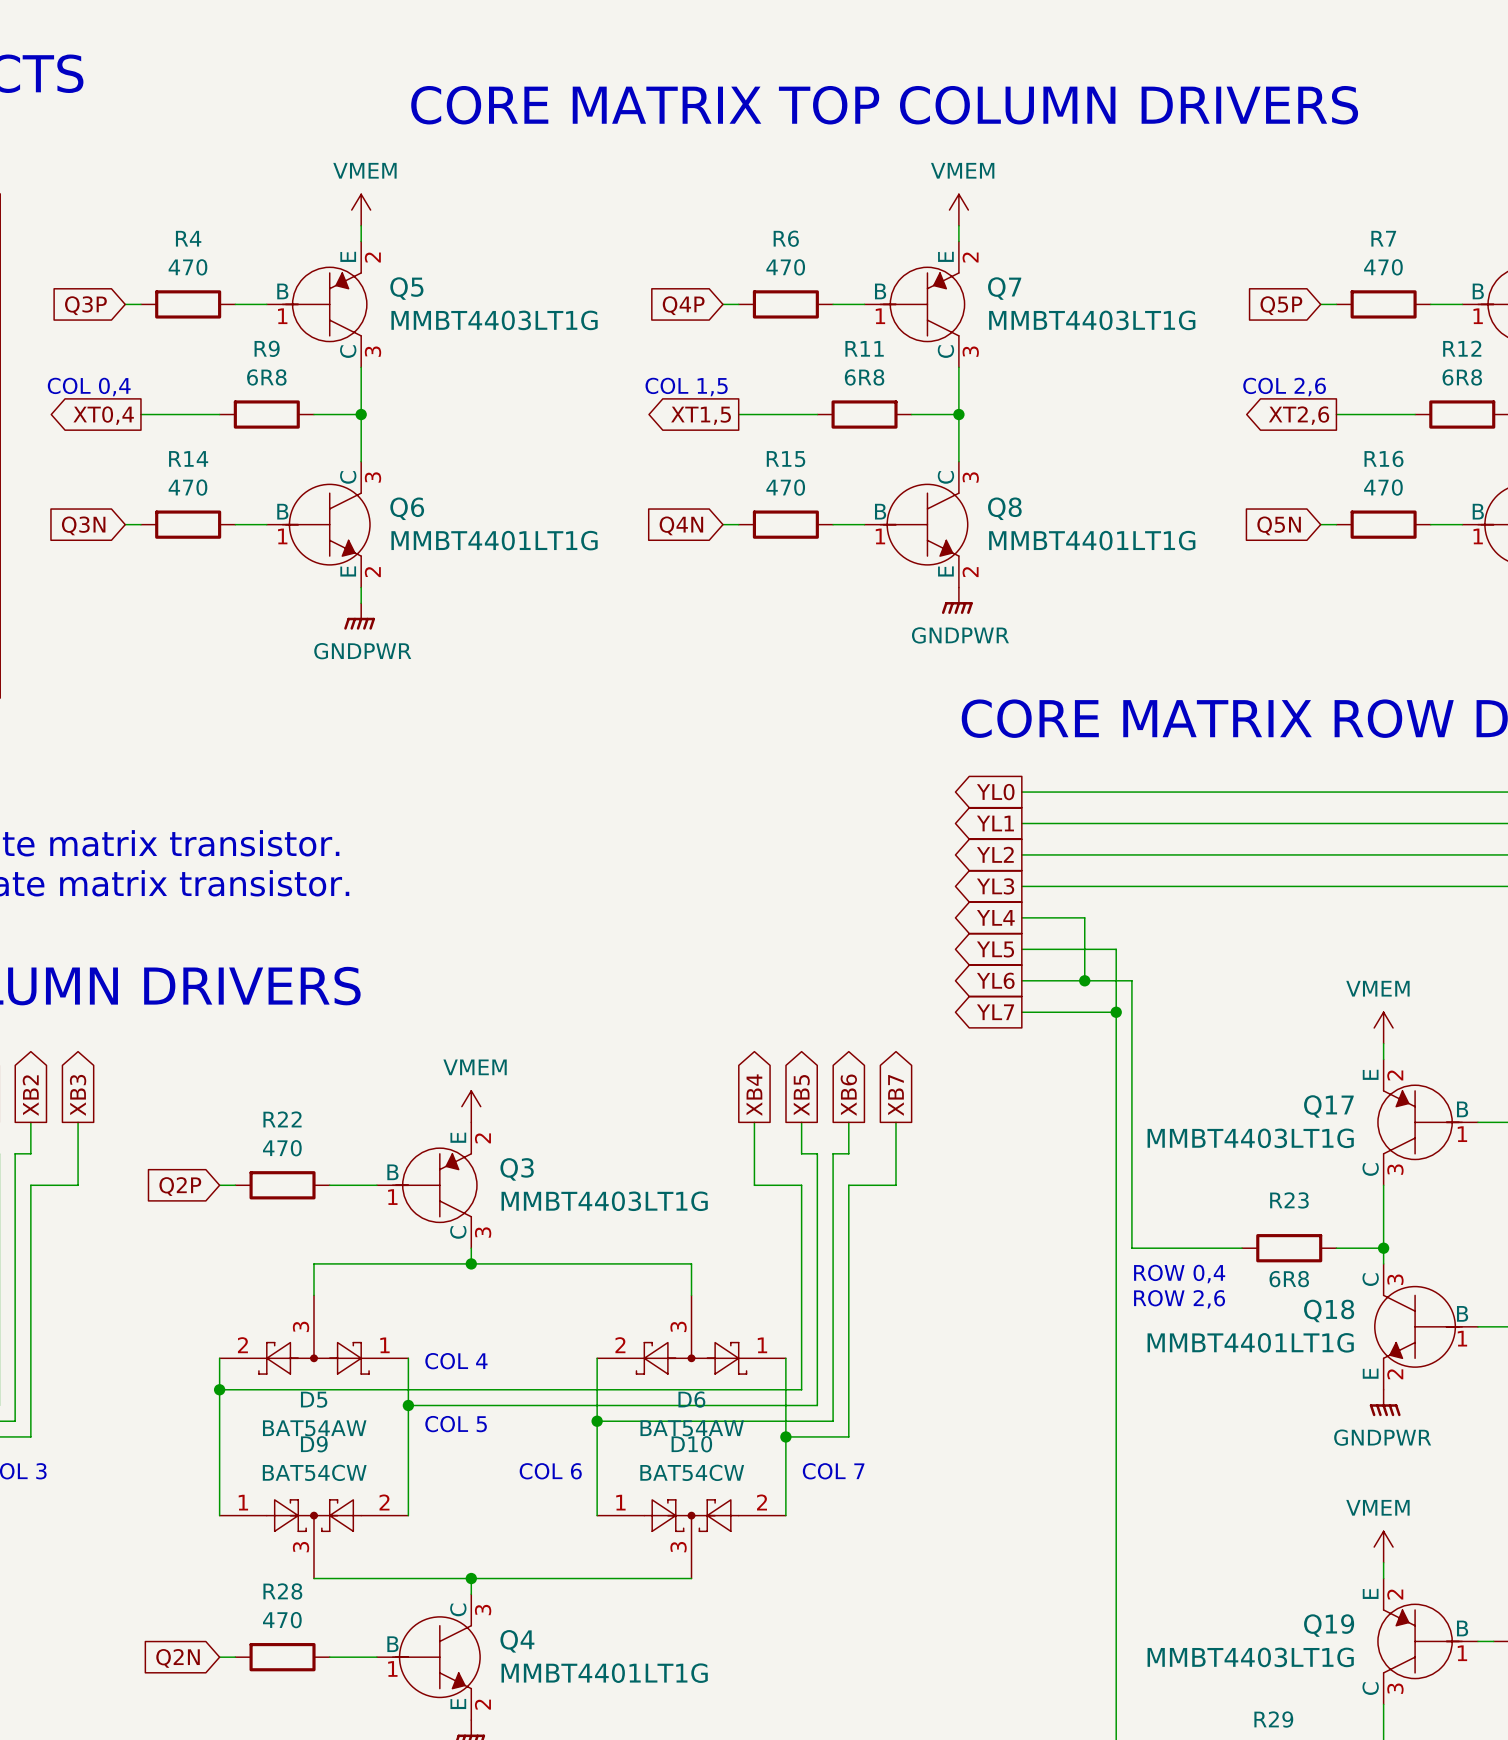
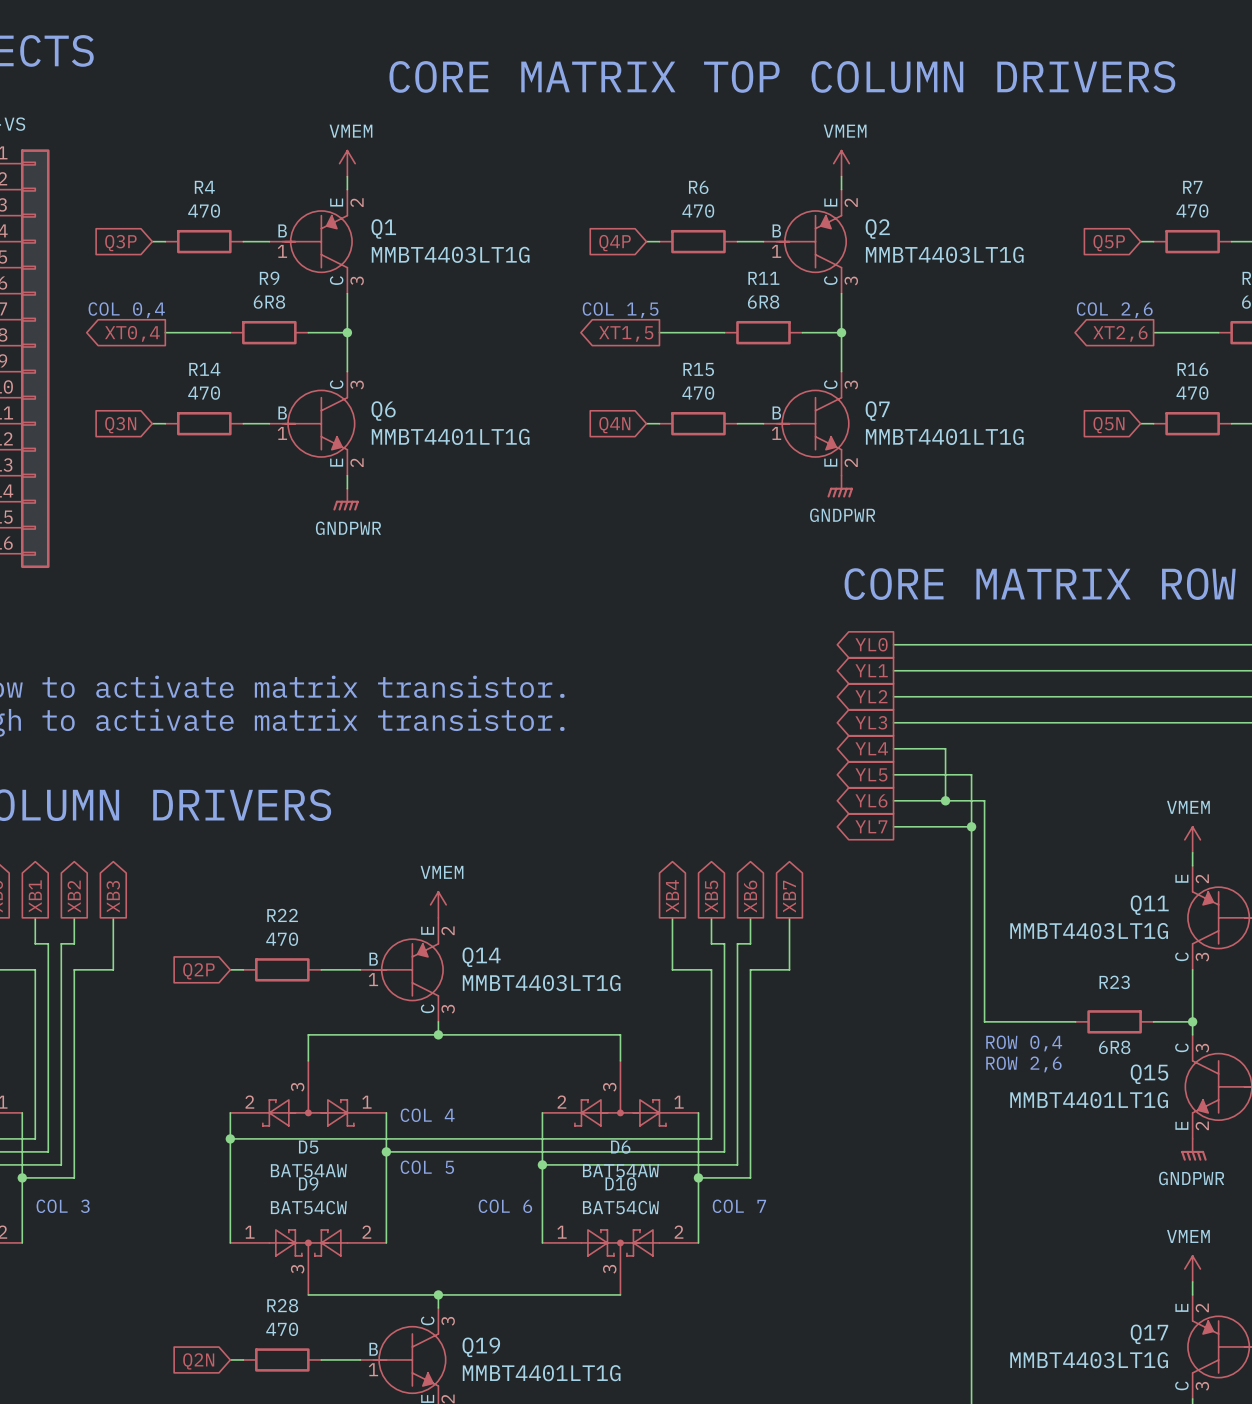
Q5 name: Q5 (406, 288) -> Q1 (383, 228)
Q7 name: Q7 (1004, 288) -> Q2 (877, 228)
Q8 name: Q8 (1004, 508) -> Q7 (877, 411)
Q17 name: Q17 (1328, 1106) -> Q11 (1149, 905)
Q3 name: Q3 (517, 1169) -> Q14 (481, 957)
Q18 name: Q18 (1329, 1310) -> Q15 (1149, 1074)
Q19 name: Q19 (1329, 1625) -> Q17 (1149, 1334)
Q4 name: Q4 (517, 1641) -> Q19 (481, 1347)

